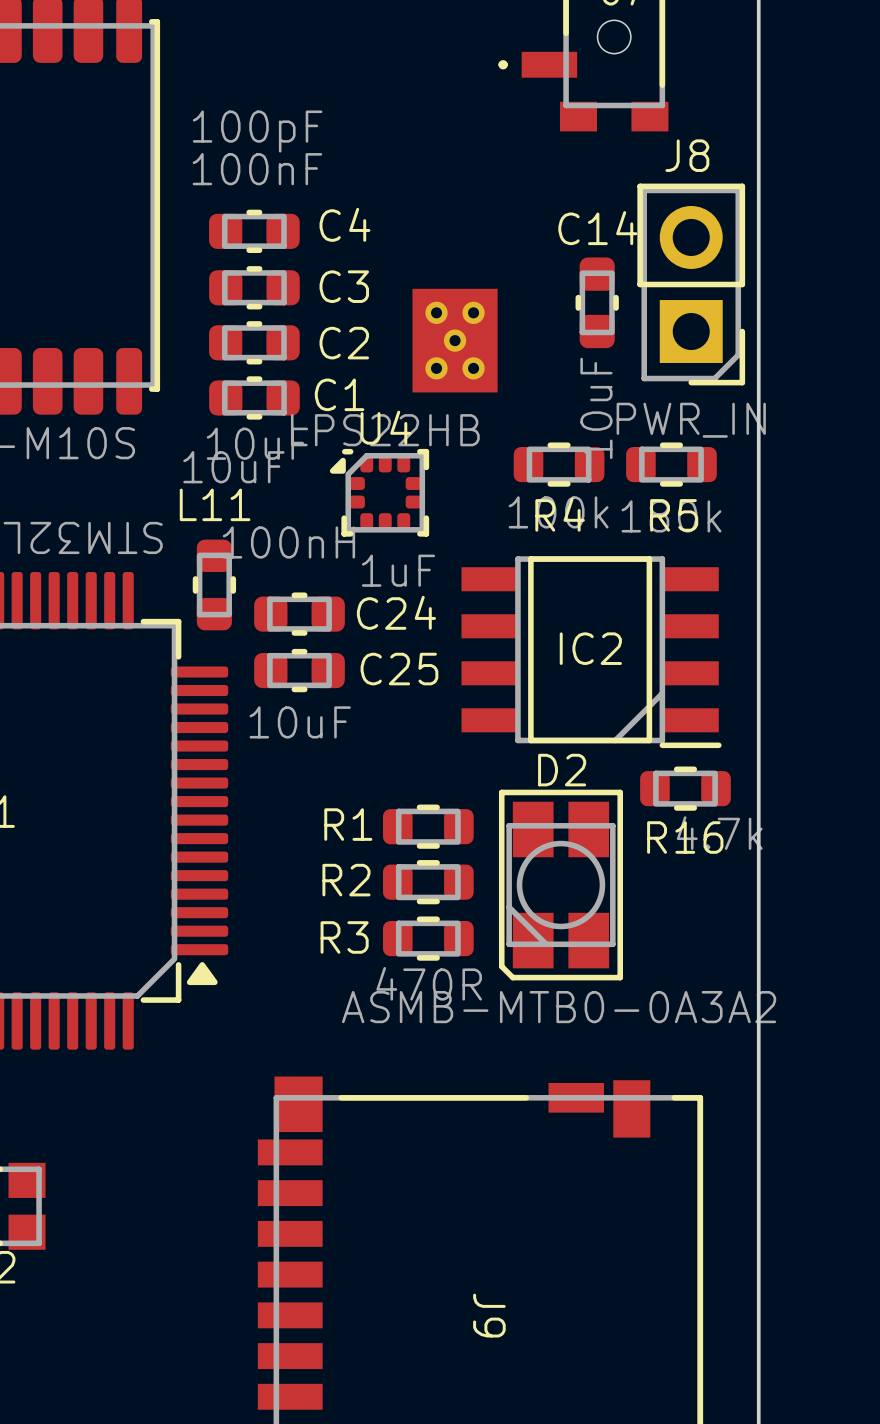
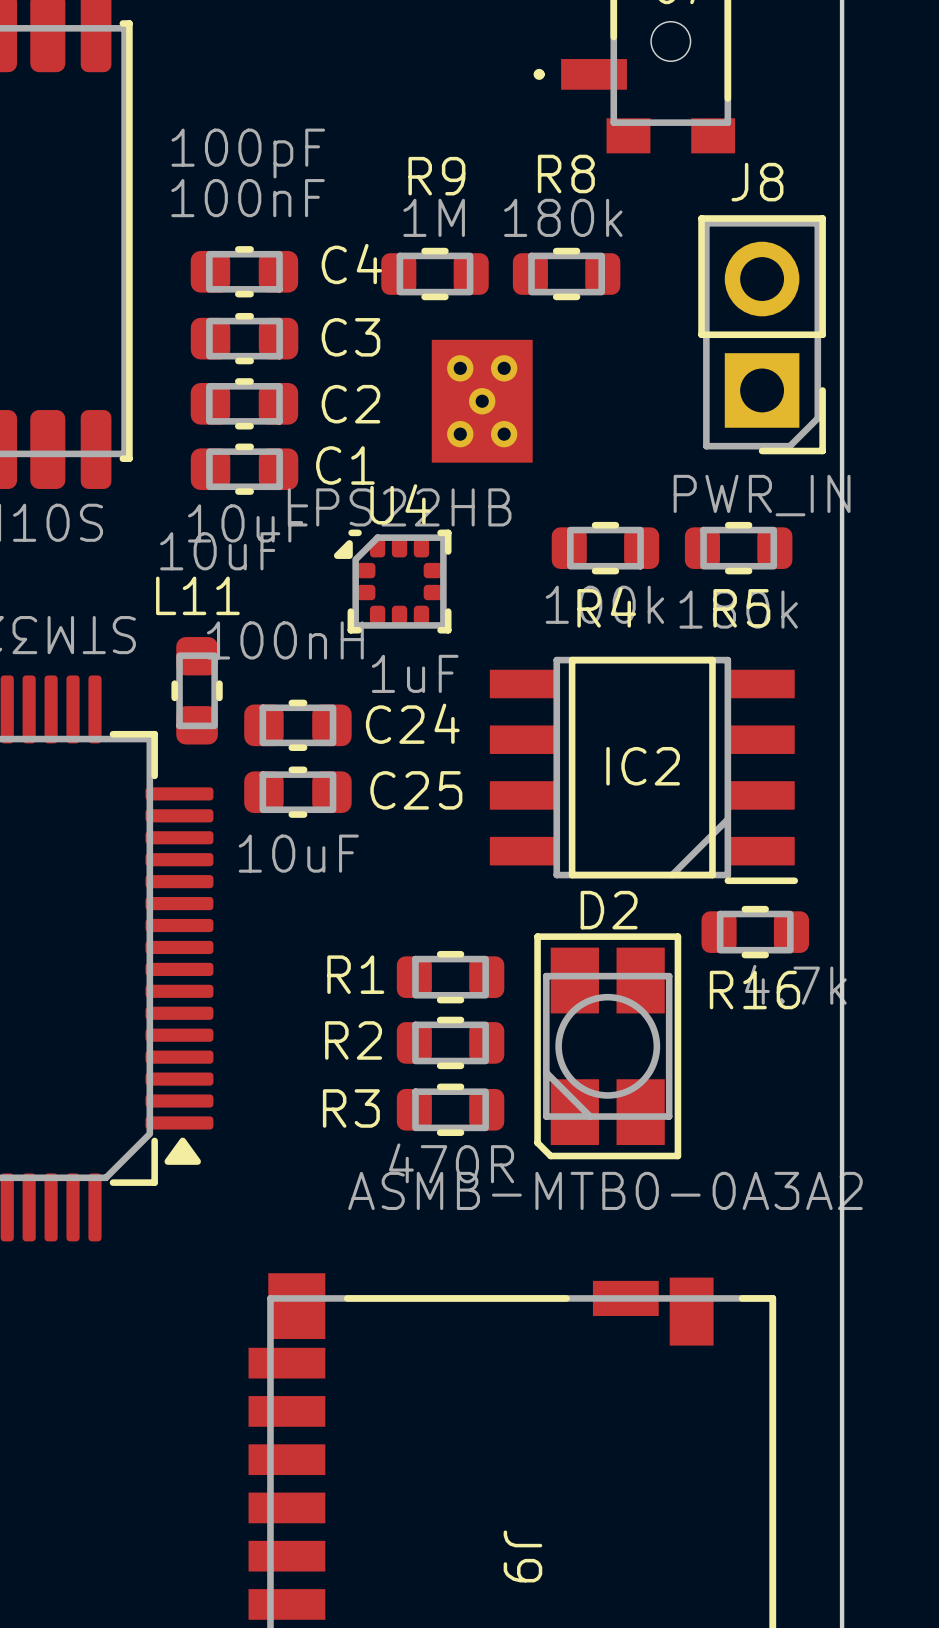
R9: none -> 1M (434, 274)
R8: none -> 180k (566, 274)
C14: 10uF (597, 302) -> none

